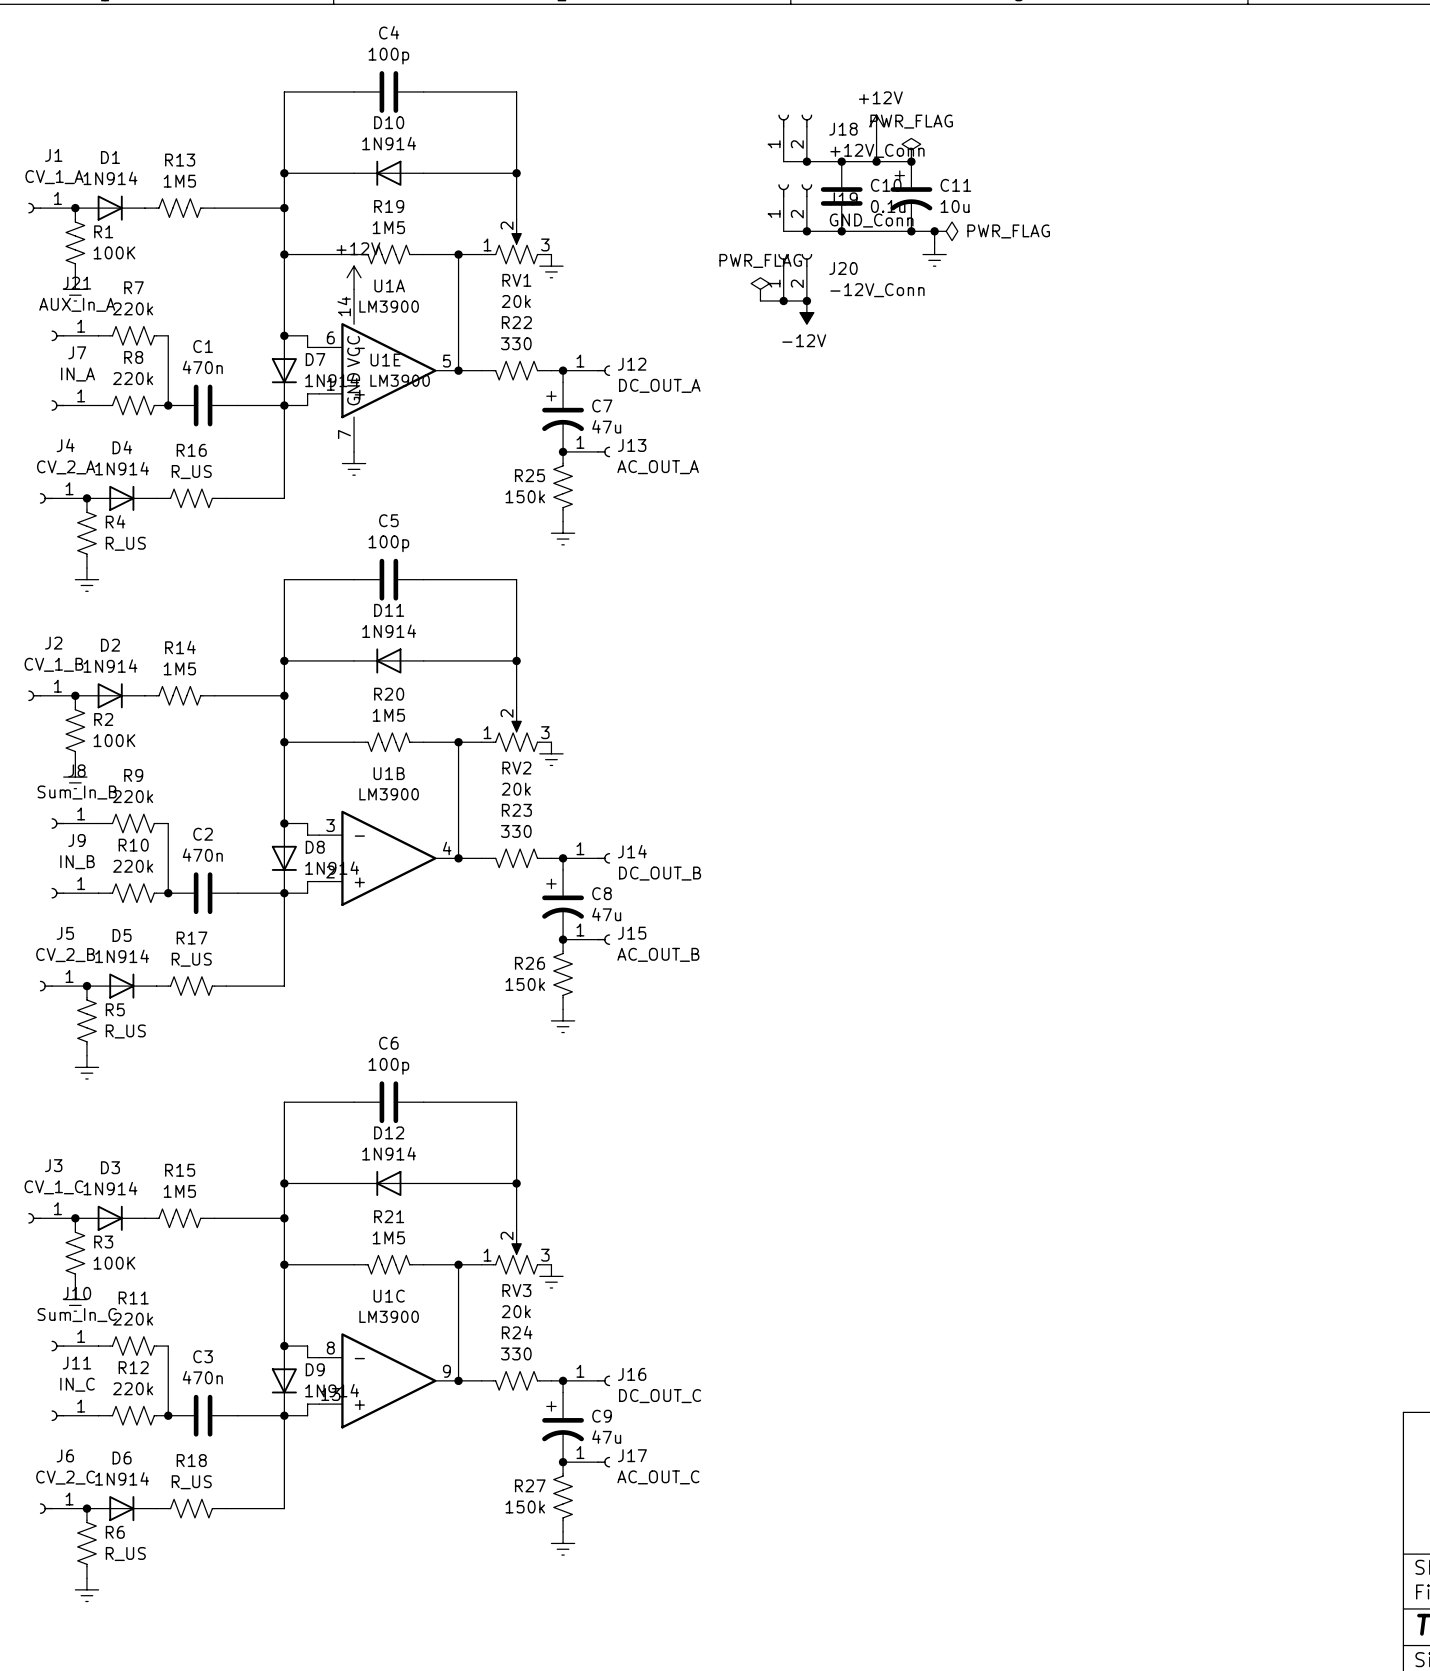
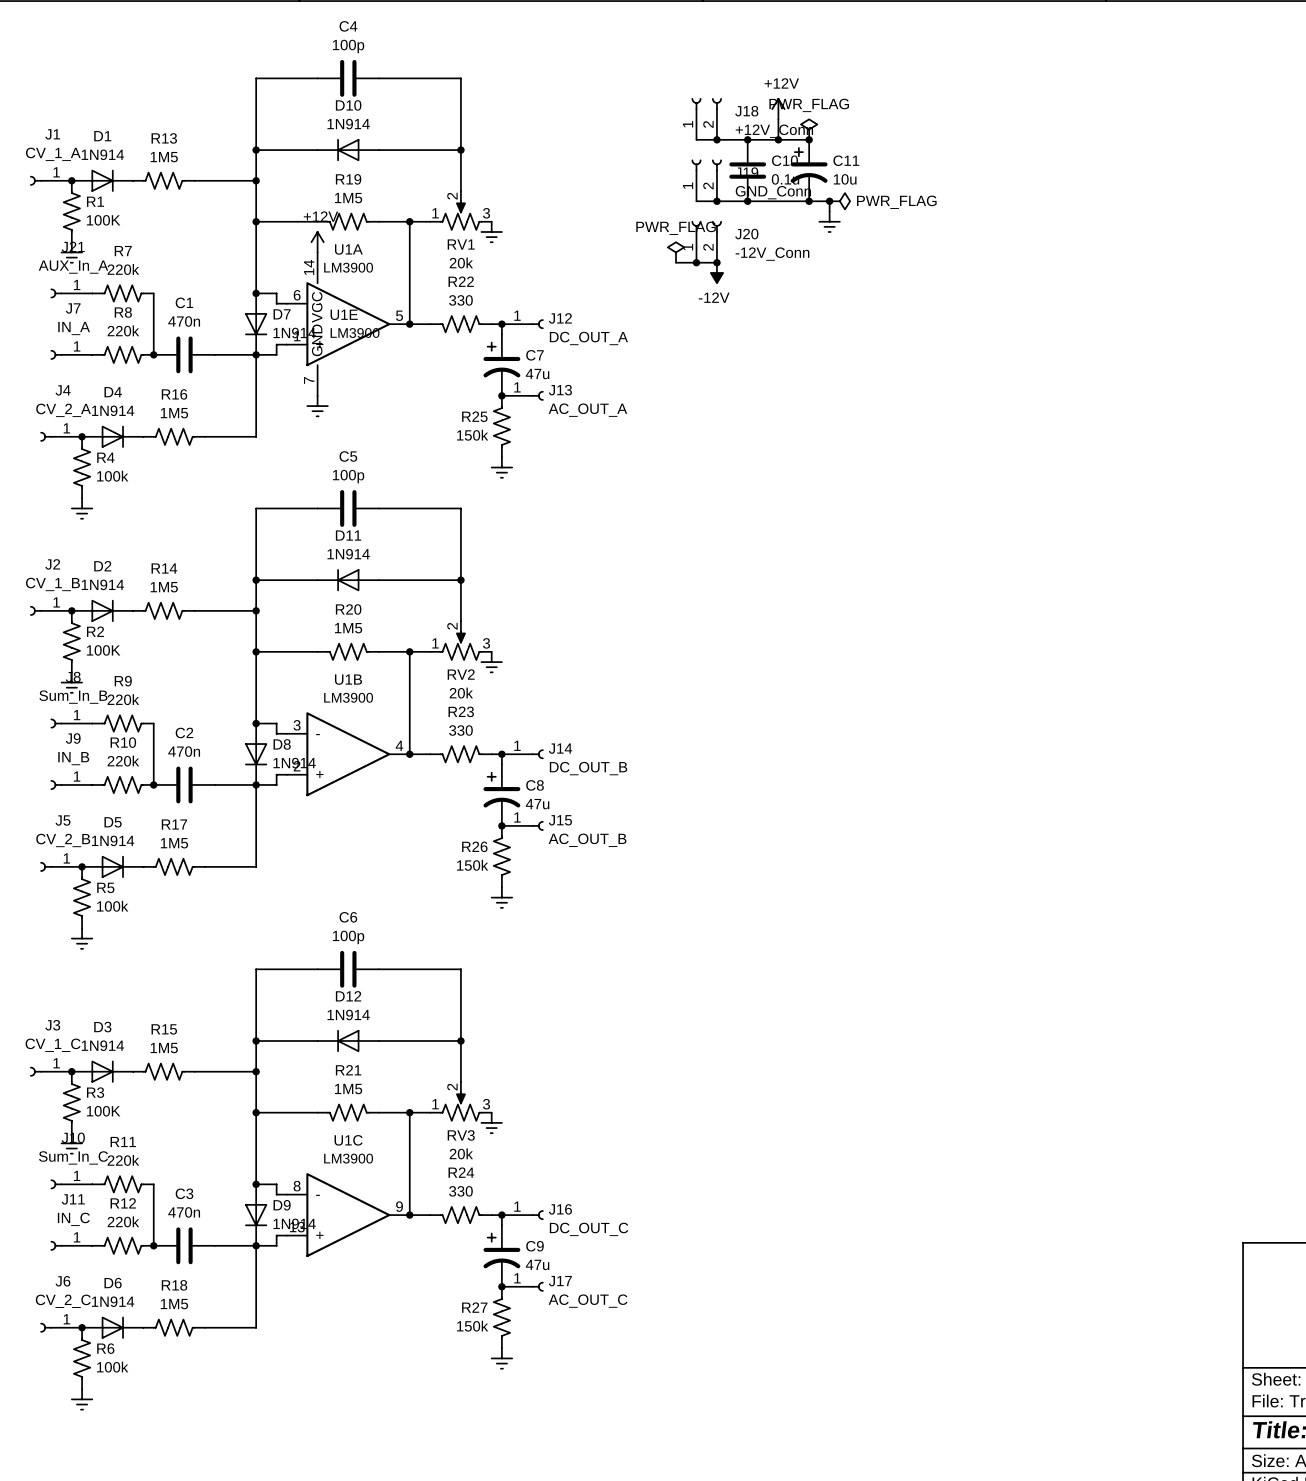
R16 value: R_US (191, 472) -> 1M5 (174, 413)
R4 value: R_US (125, 543) -> 100k (112, 476)
R17 value: R_US (191, 959) -> 1M5 (174, 843)
R5 value: R_US (125, 1031) -> 100k (112, 906)
R18 value: R_US (191, 1482) -> 1M5 (174, 1304)
R6 value: R_US (125, 1554) -> 100k (112, 1367)

